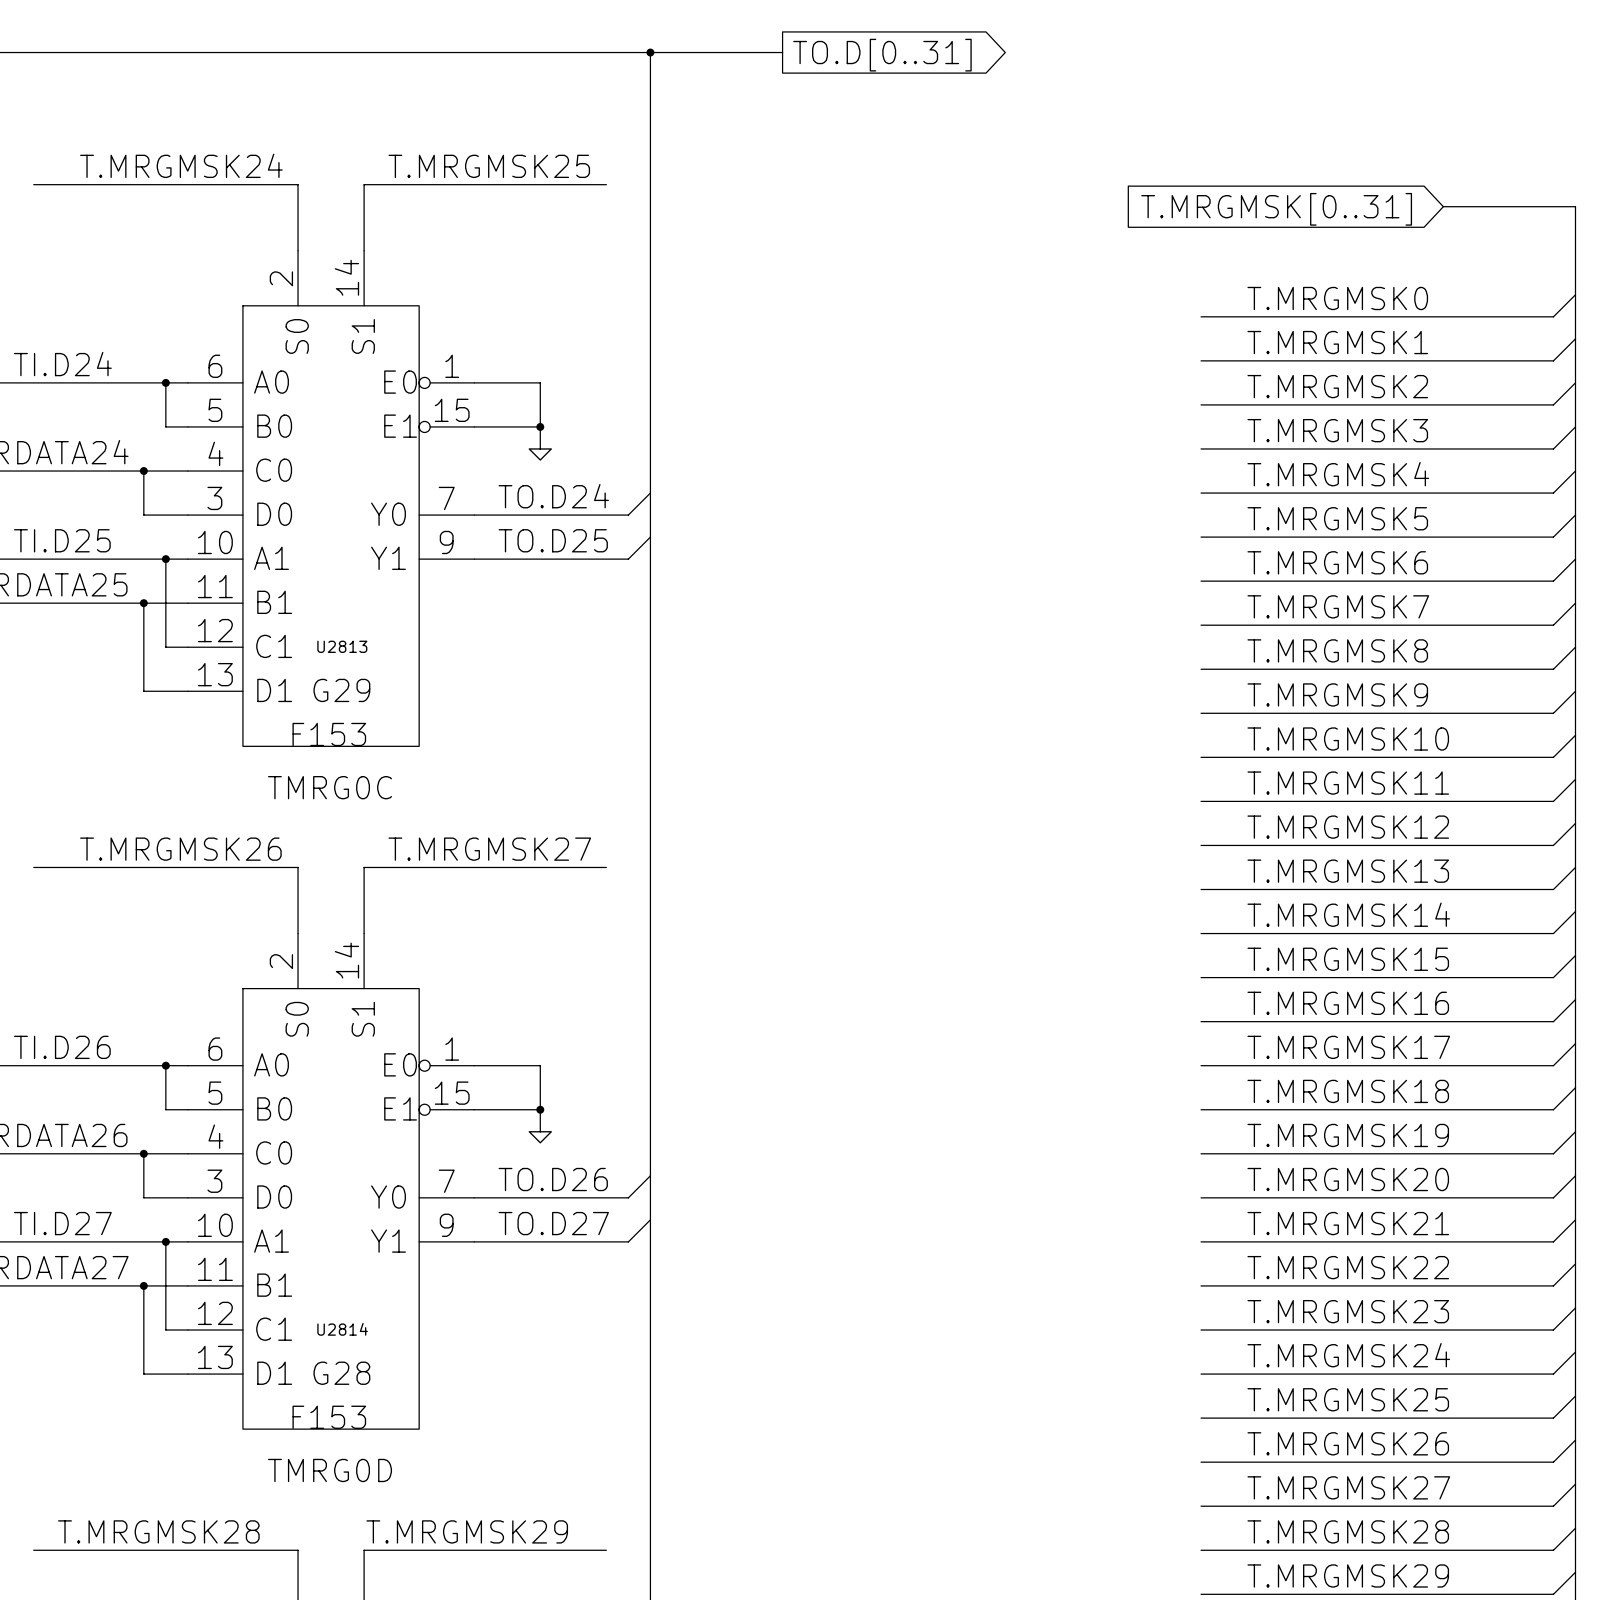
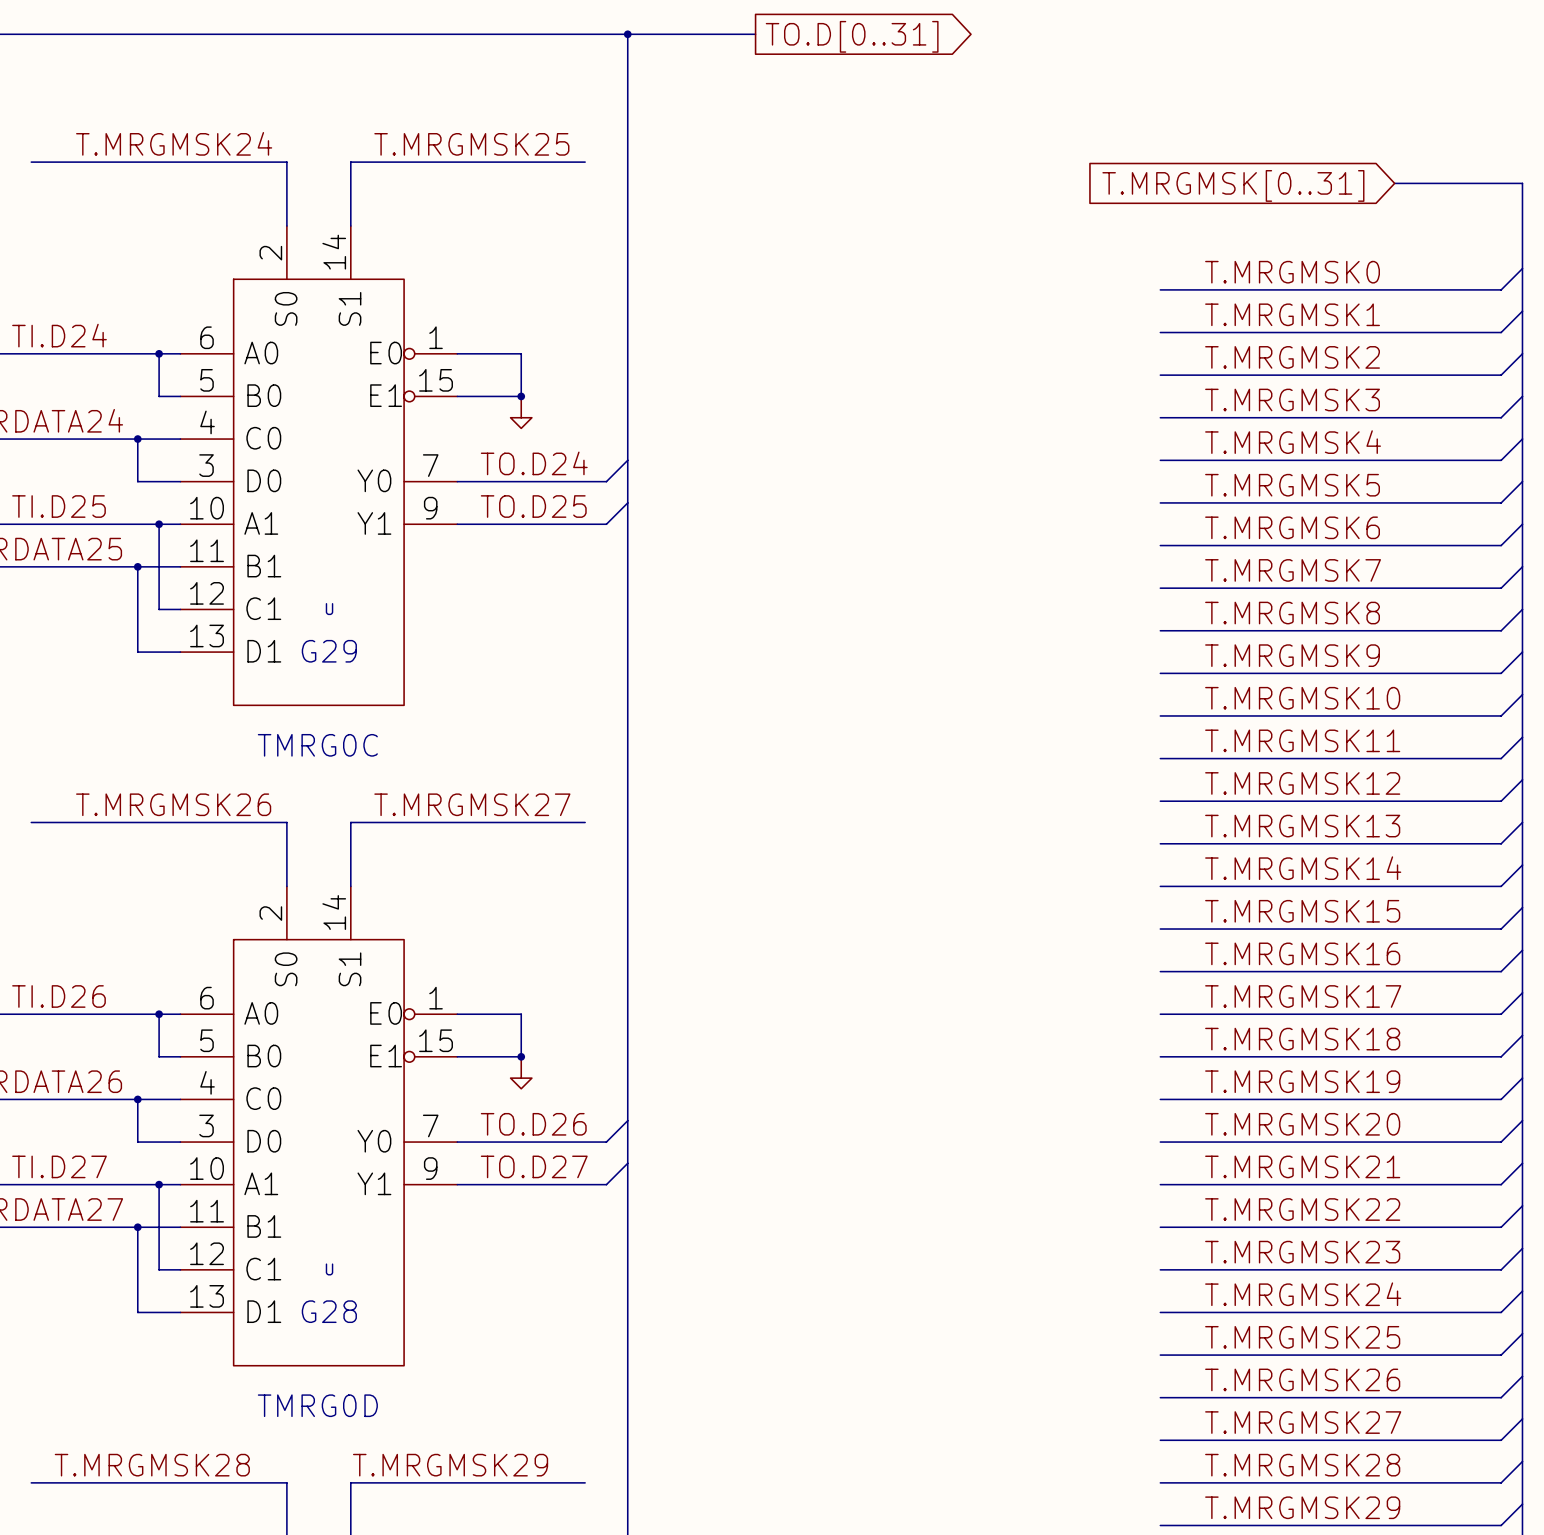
U2813 name: U2813 (342, 646) -> U (329, 609)
U2813 value: F153 (329, 734) -> none
U2814 name: U2814 (342, 1329) -> U (329, 1269)
U2814 value: F153 (329, 1417) -> none

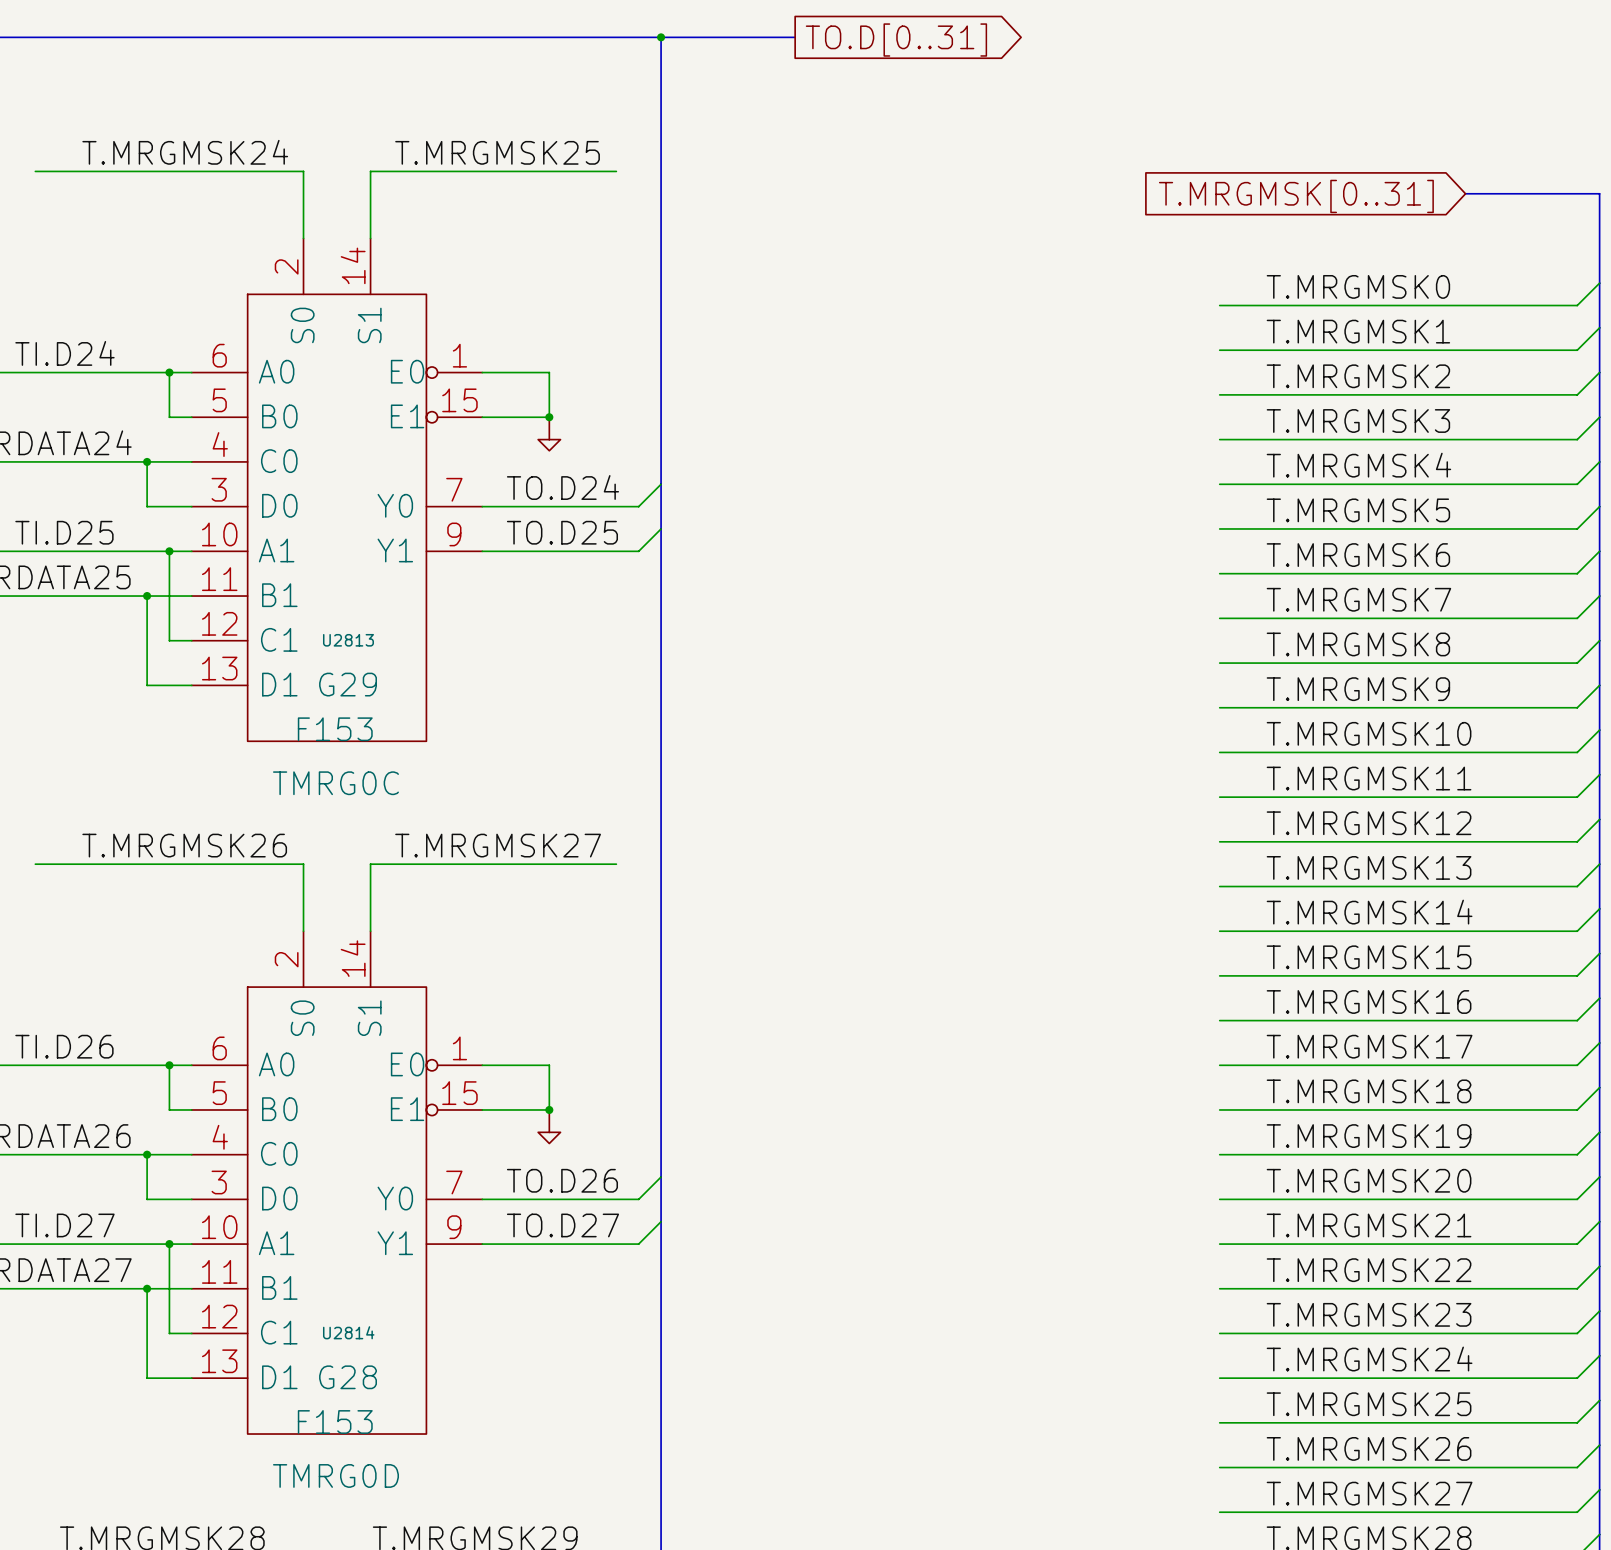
U name: U (329, 609) -> U2813 (348, 640)
U value: none -> F153 (335, 729)
U name: U (329, 1269) -> U2814 (348, 1332)
U value: none -> F153 (335, 1422)

